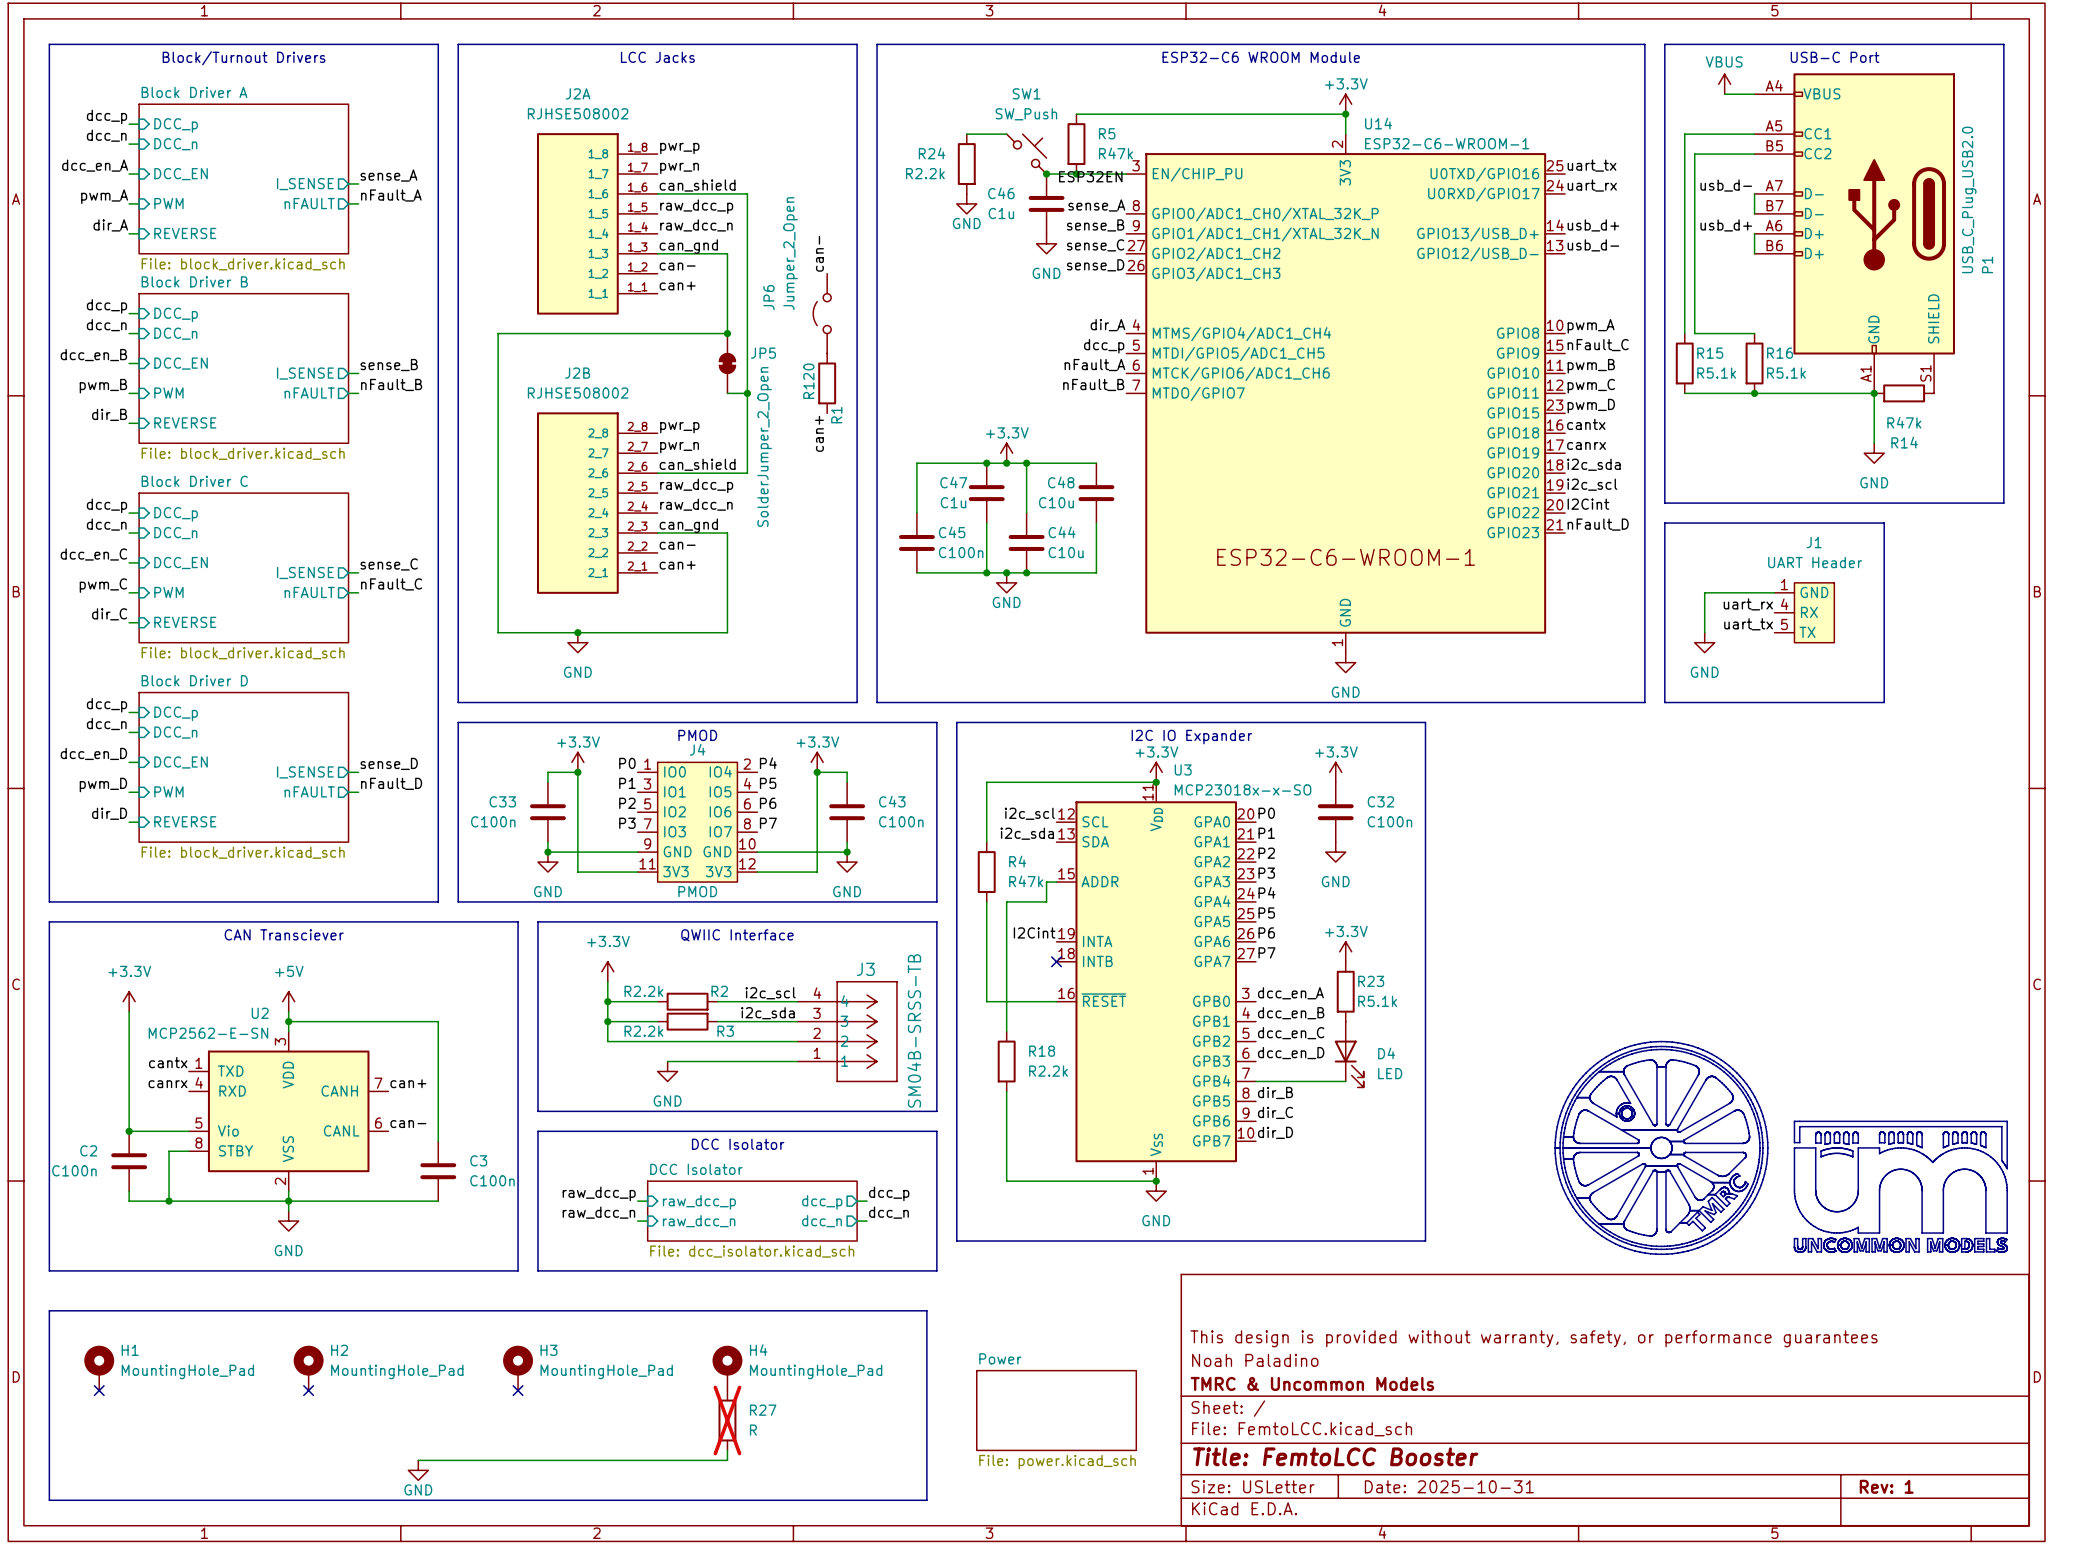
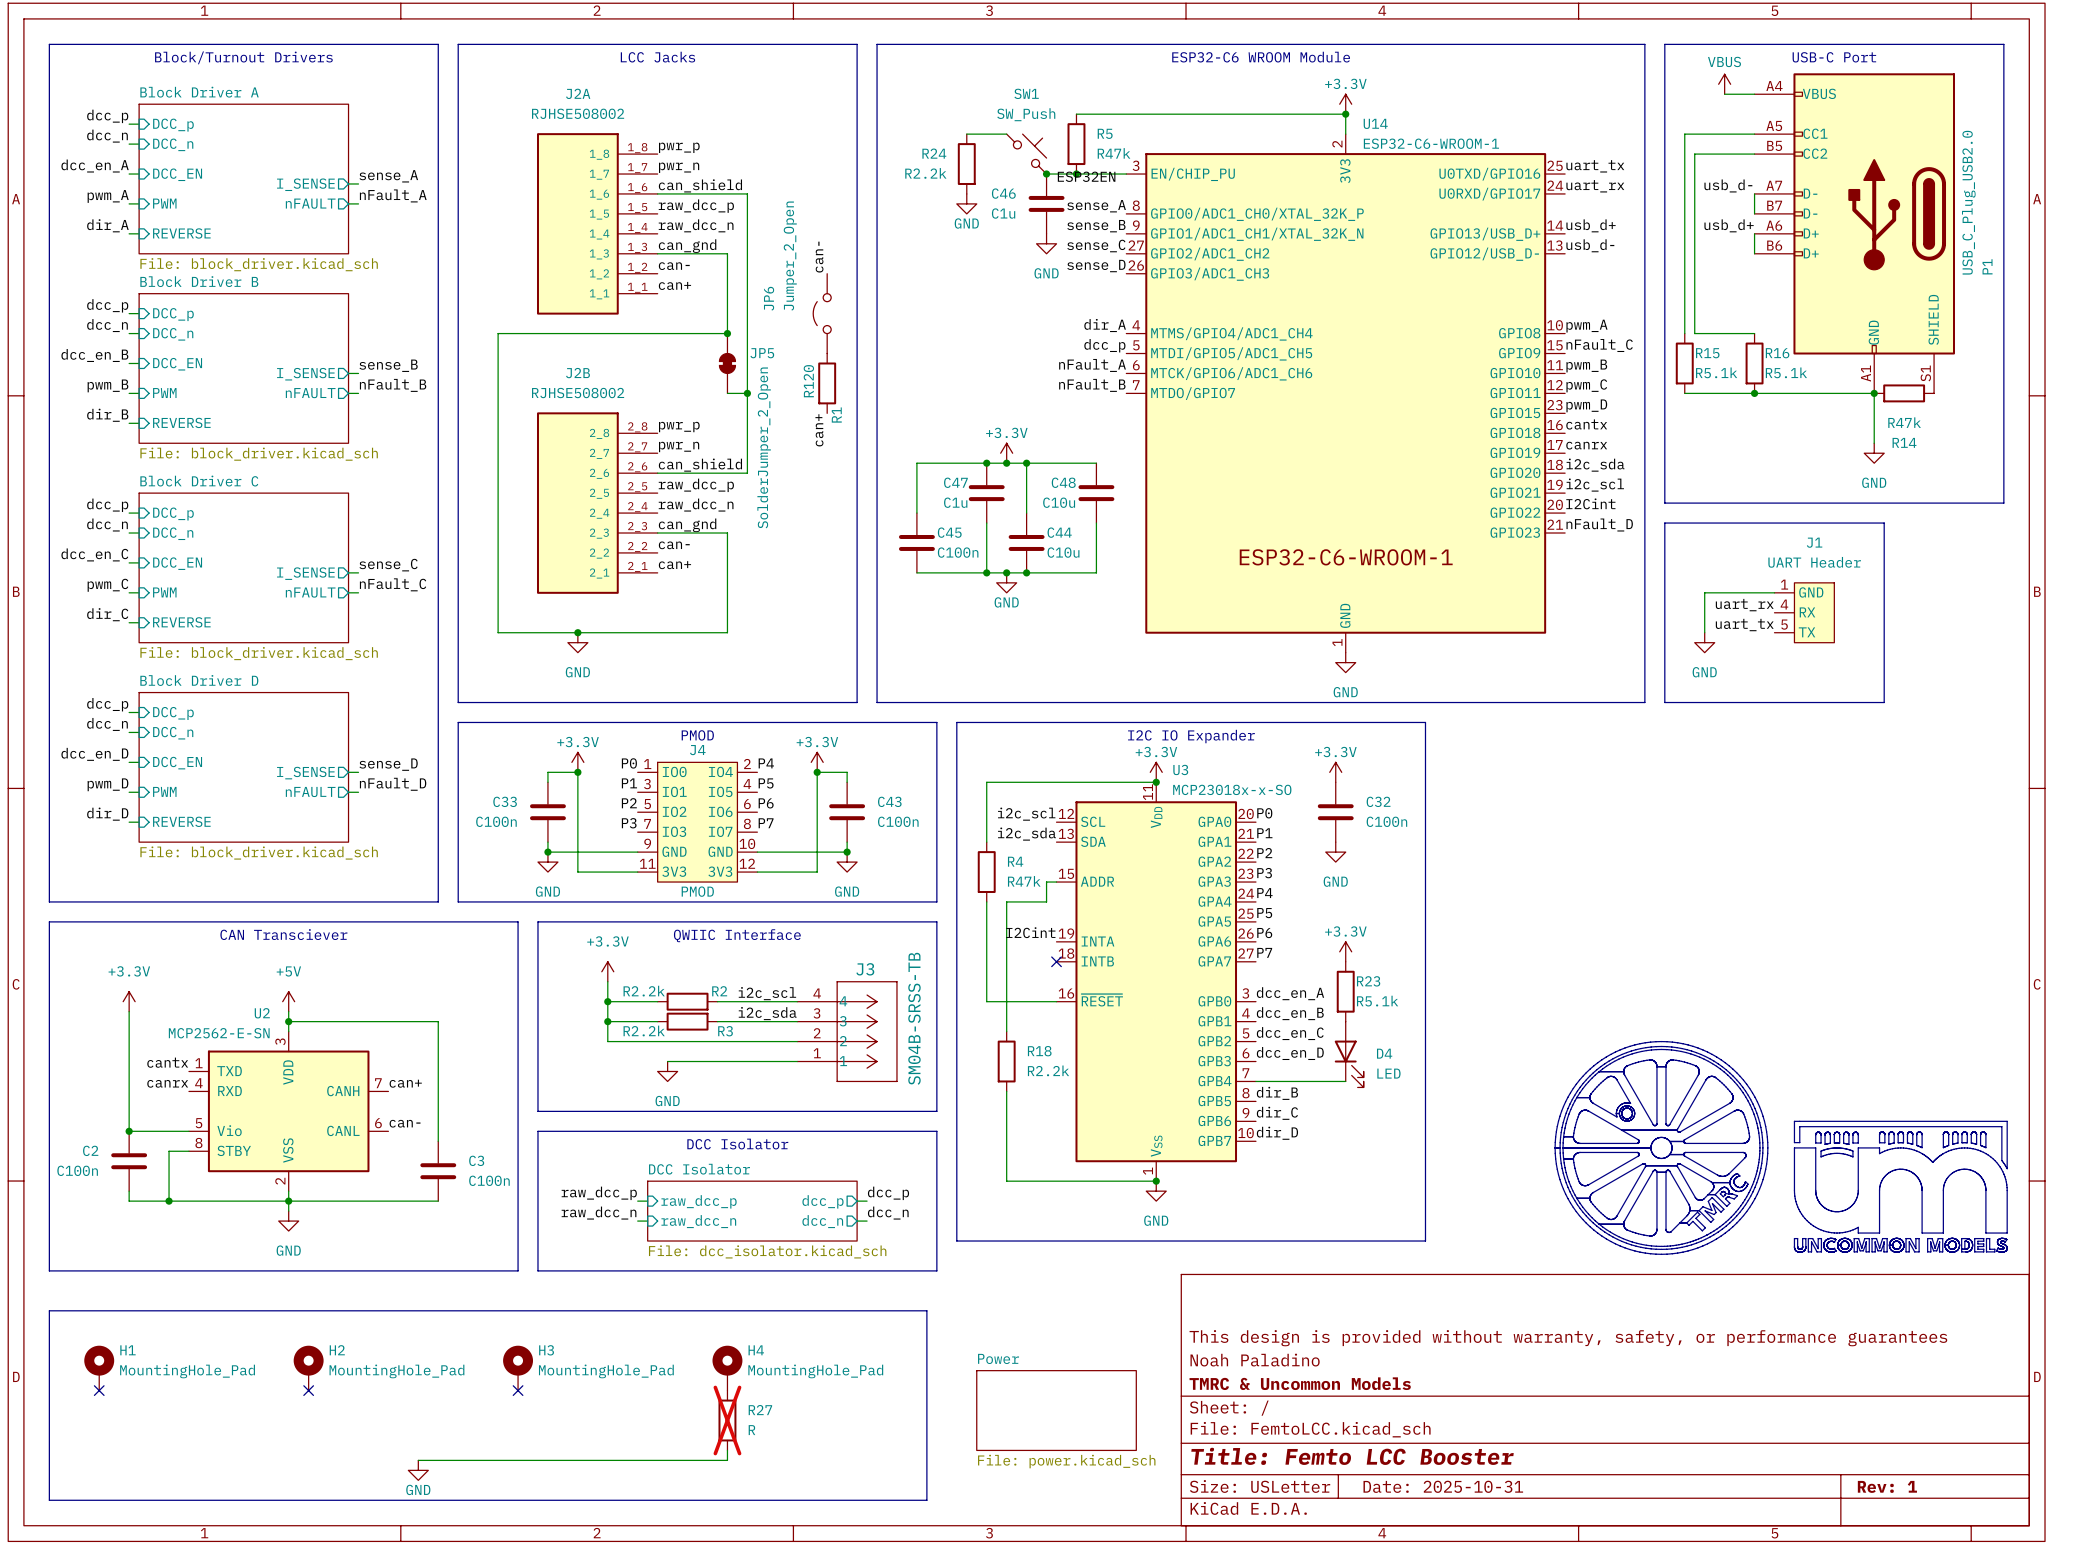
title block: Title: FemtoLCC Booster (1335, 1456) -> Title: Femto LCC Booster (1352, 1456)

